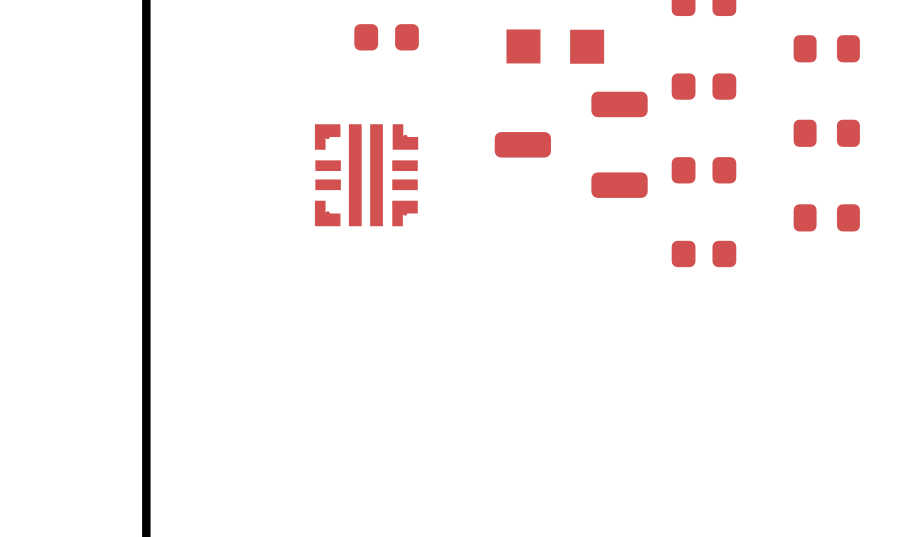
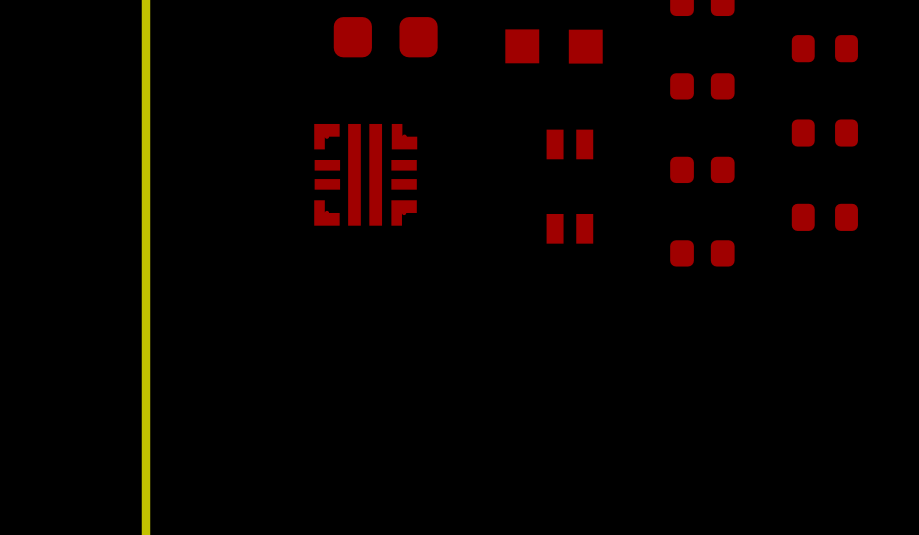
part footprint: [354, 24, 419, 51] -> [333, 17, 438, 58]
part footprint: [494, 91, 648, 198] -> [546, 129, 594, 160]
part: none -> (569, 228)

